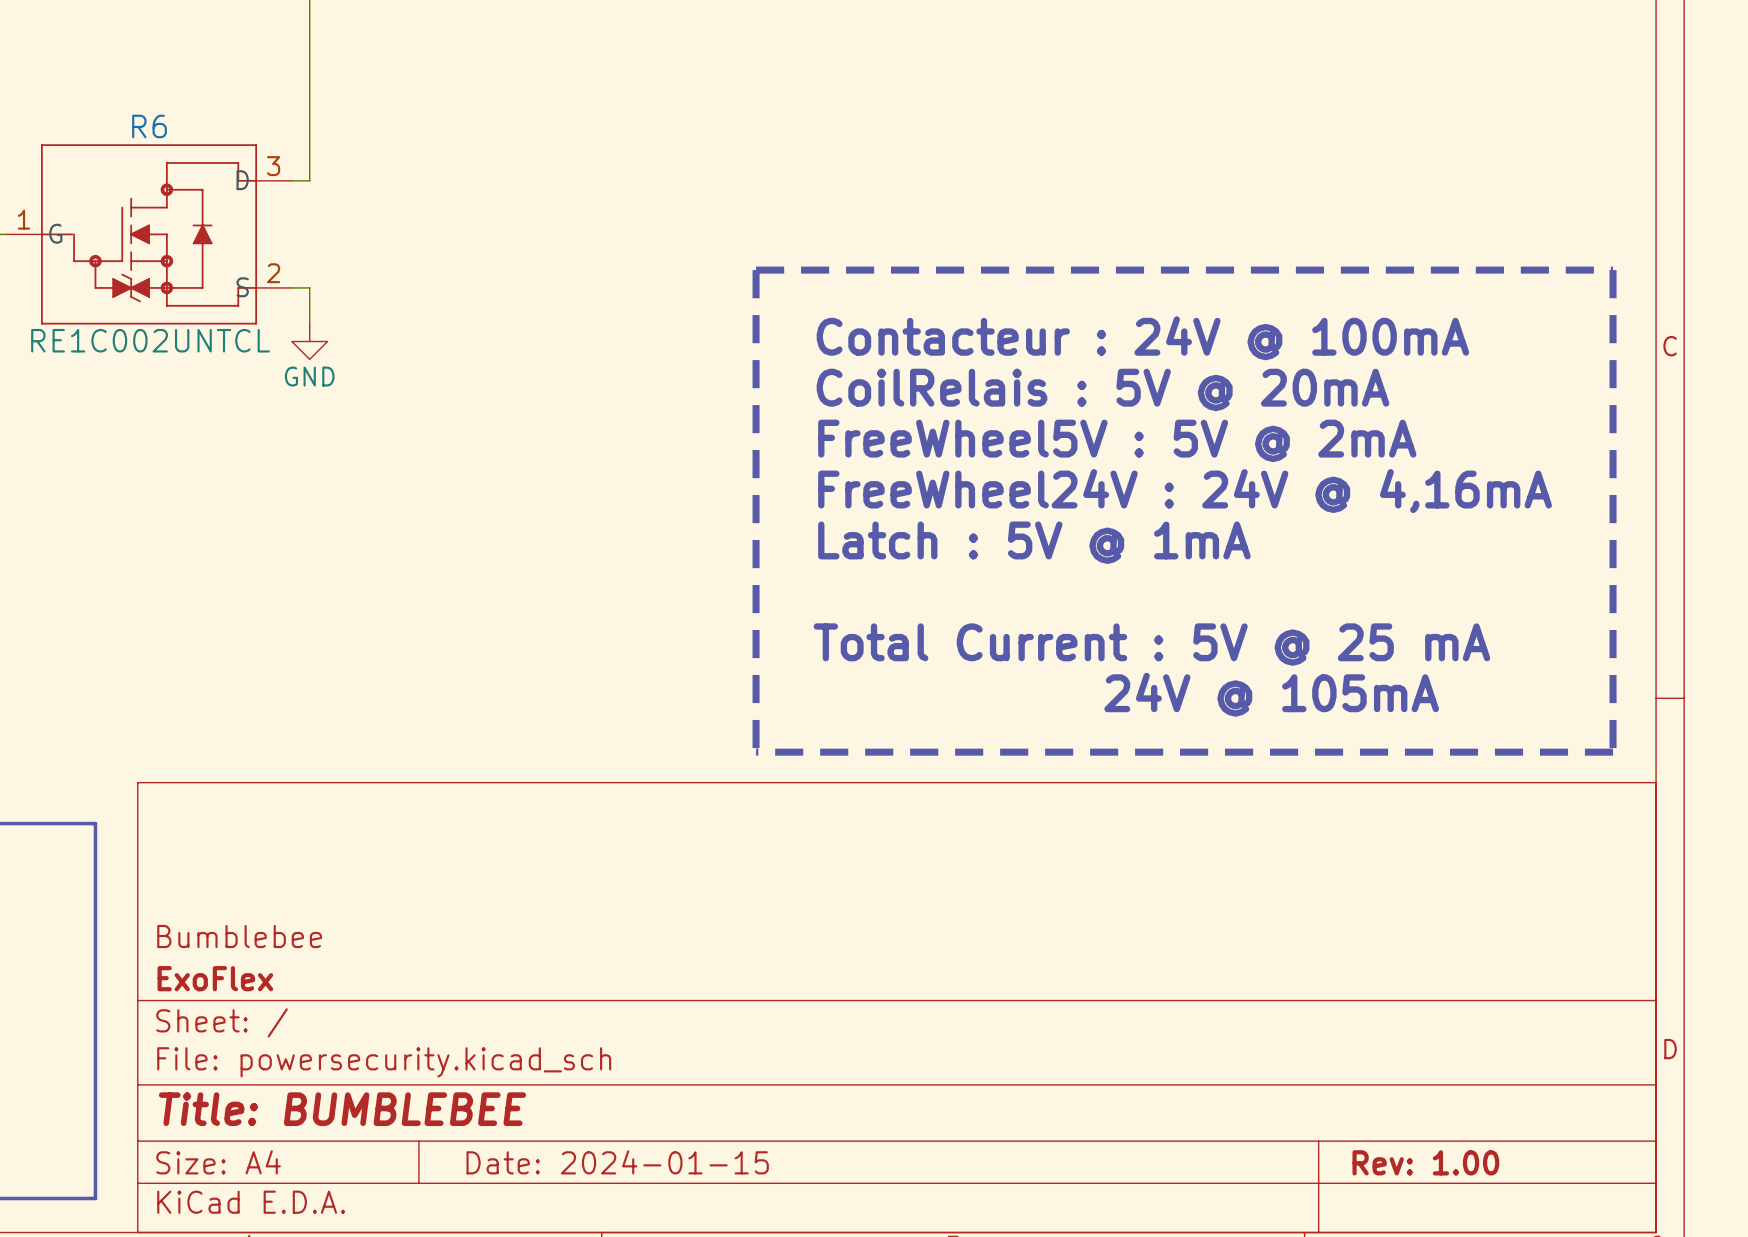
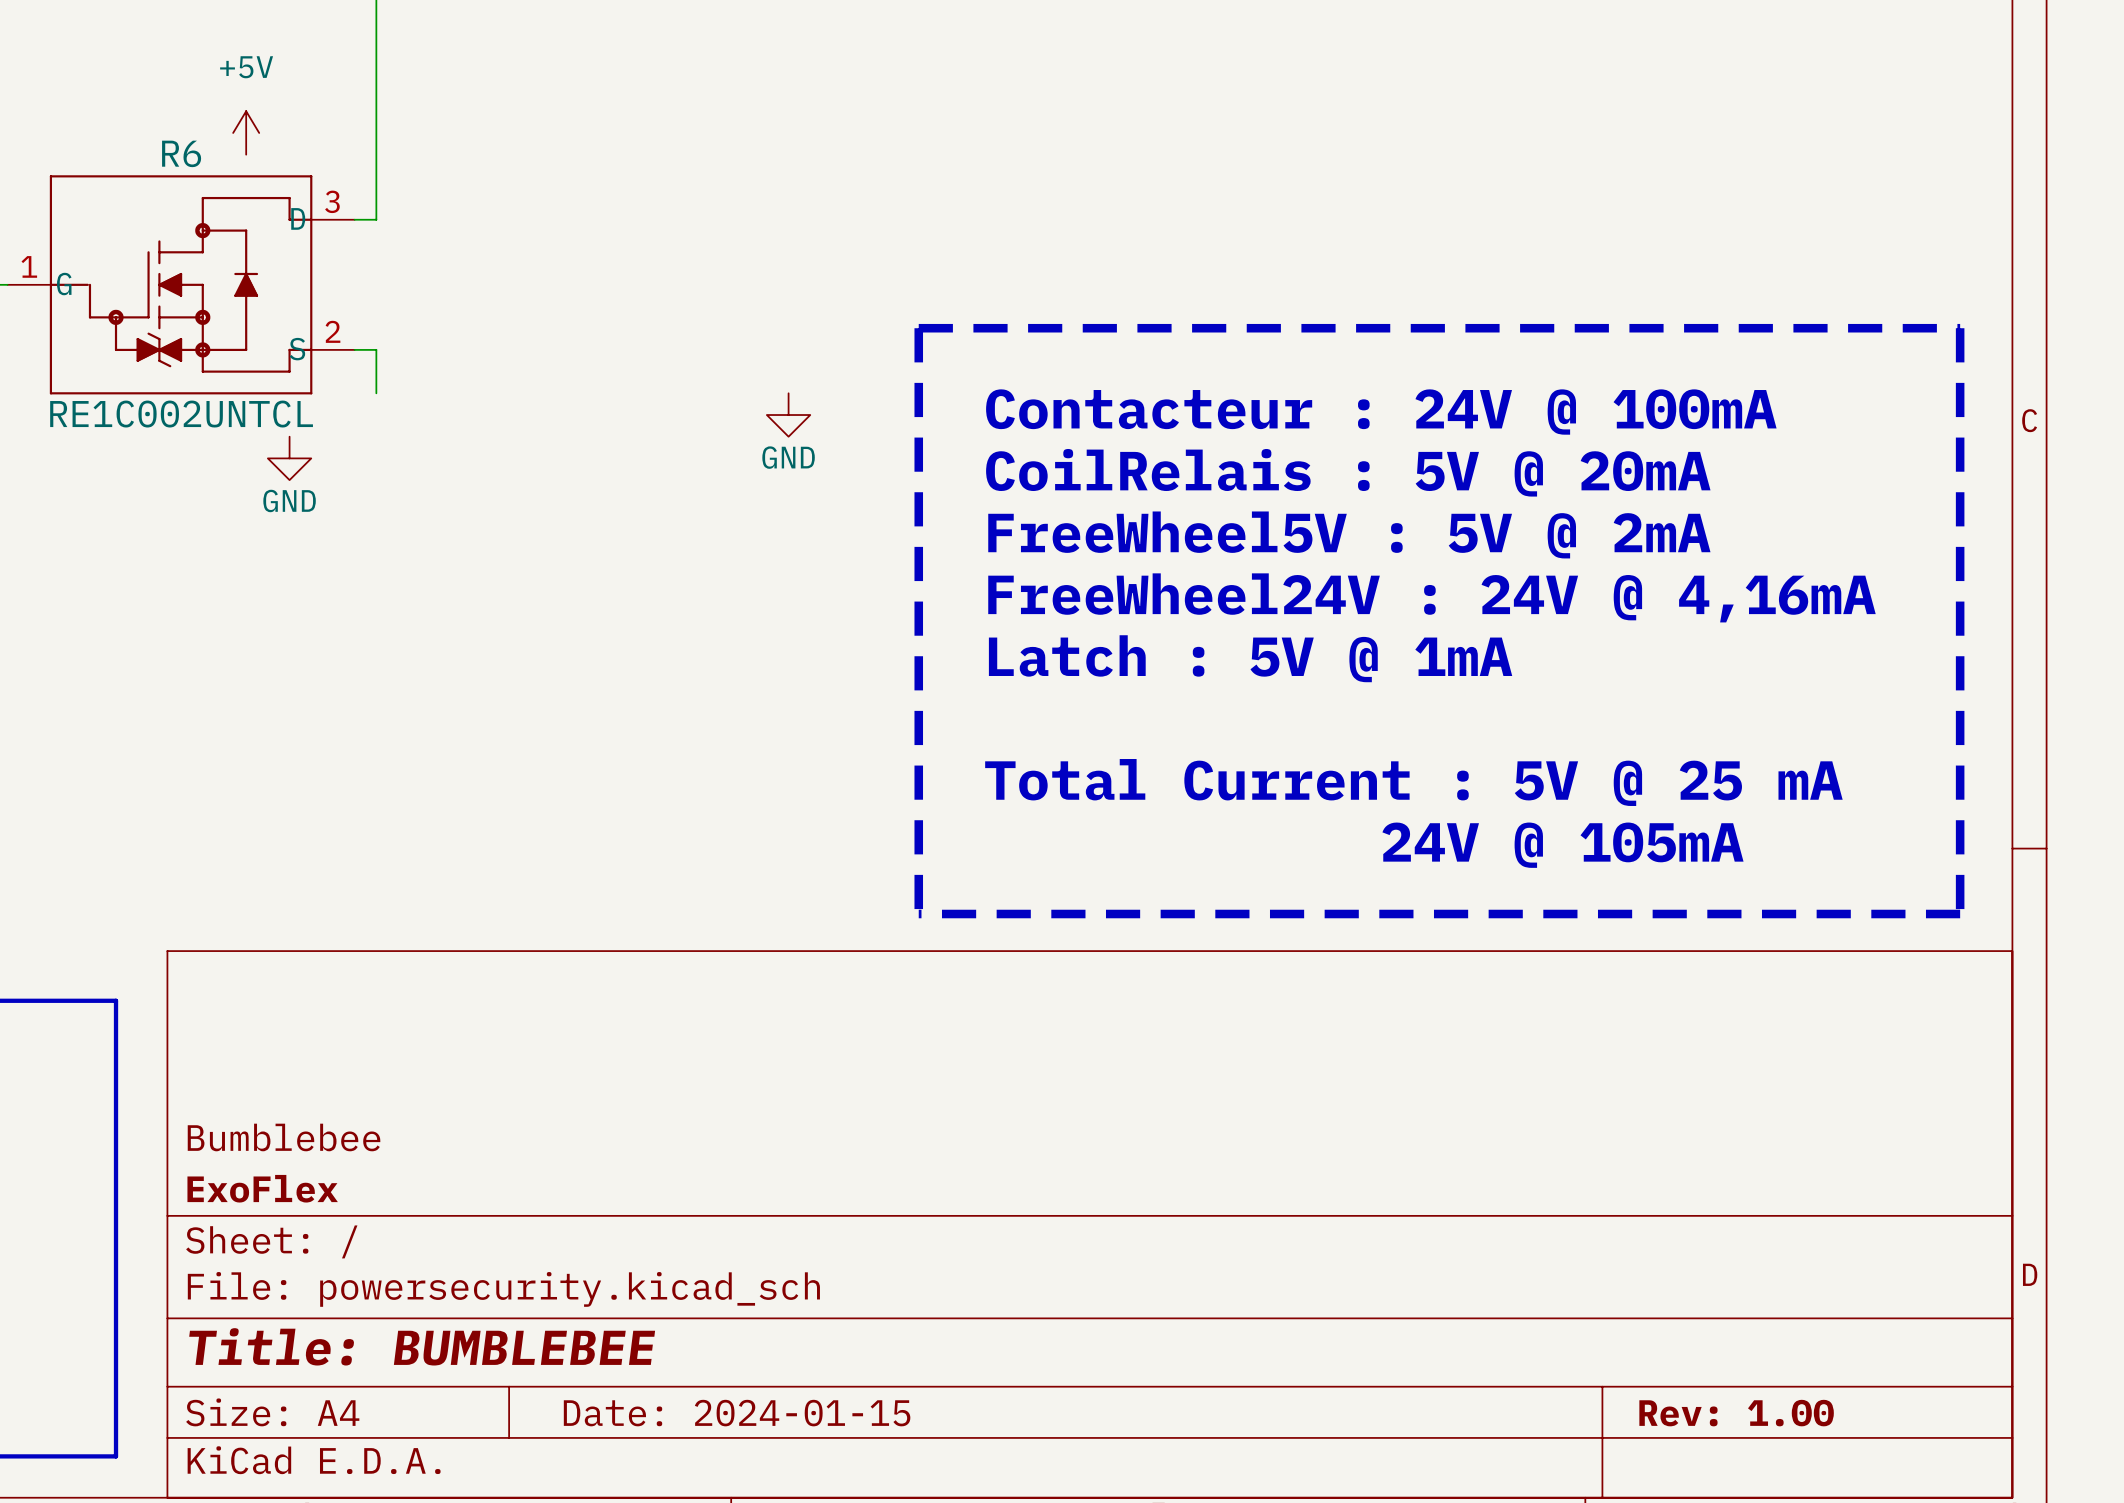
power symbol: none -> +5V (246, 132)
power symbol position: GND (309, 341) -> GND (289, 458)
power symbol: none -> GND (788, 415)

